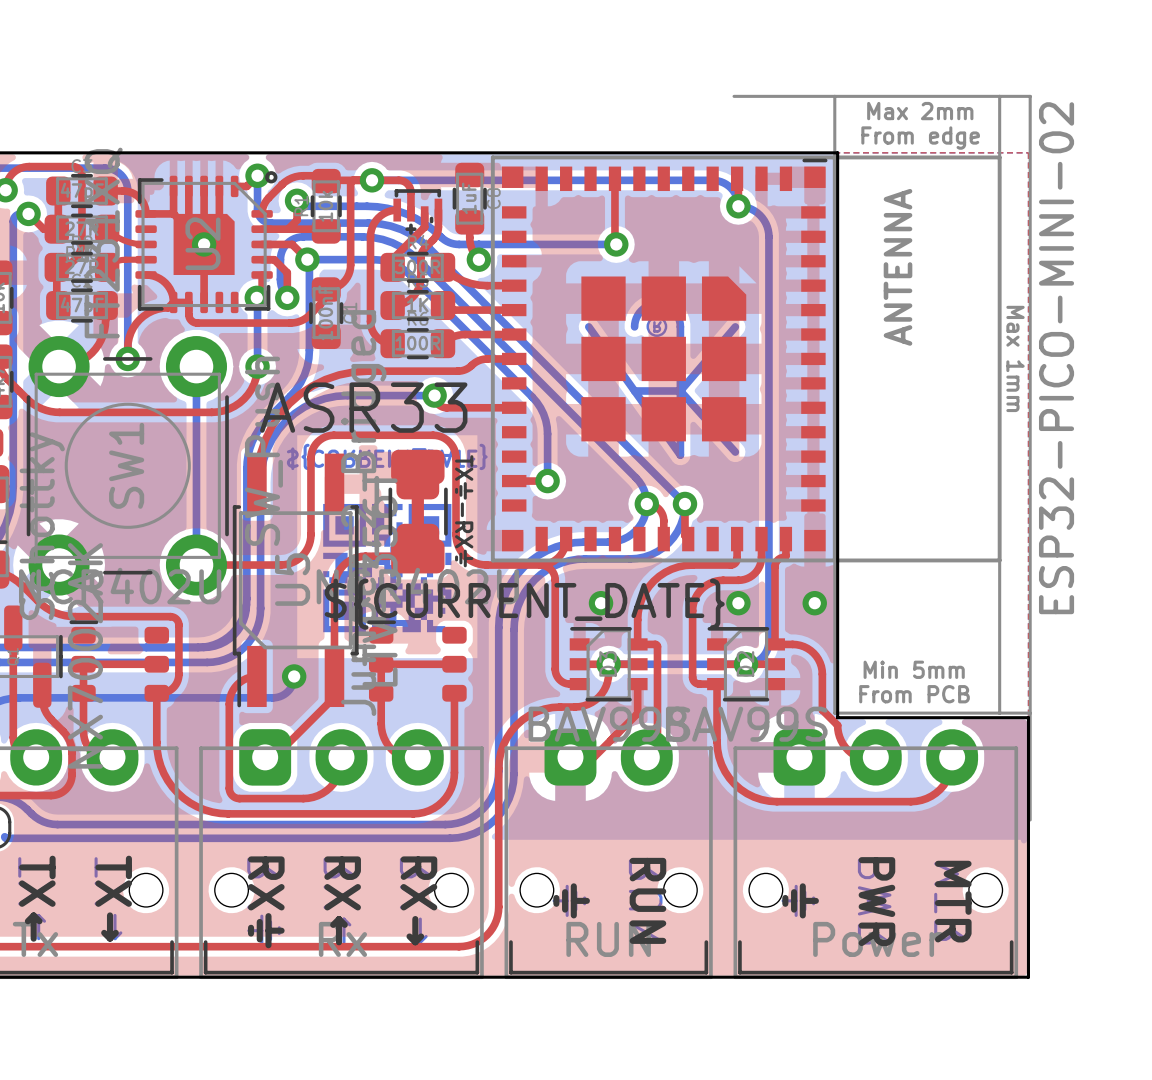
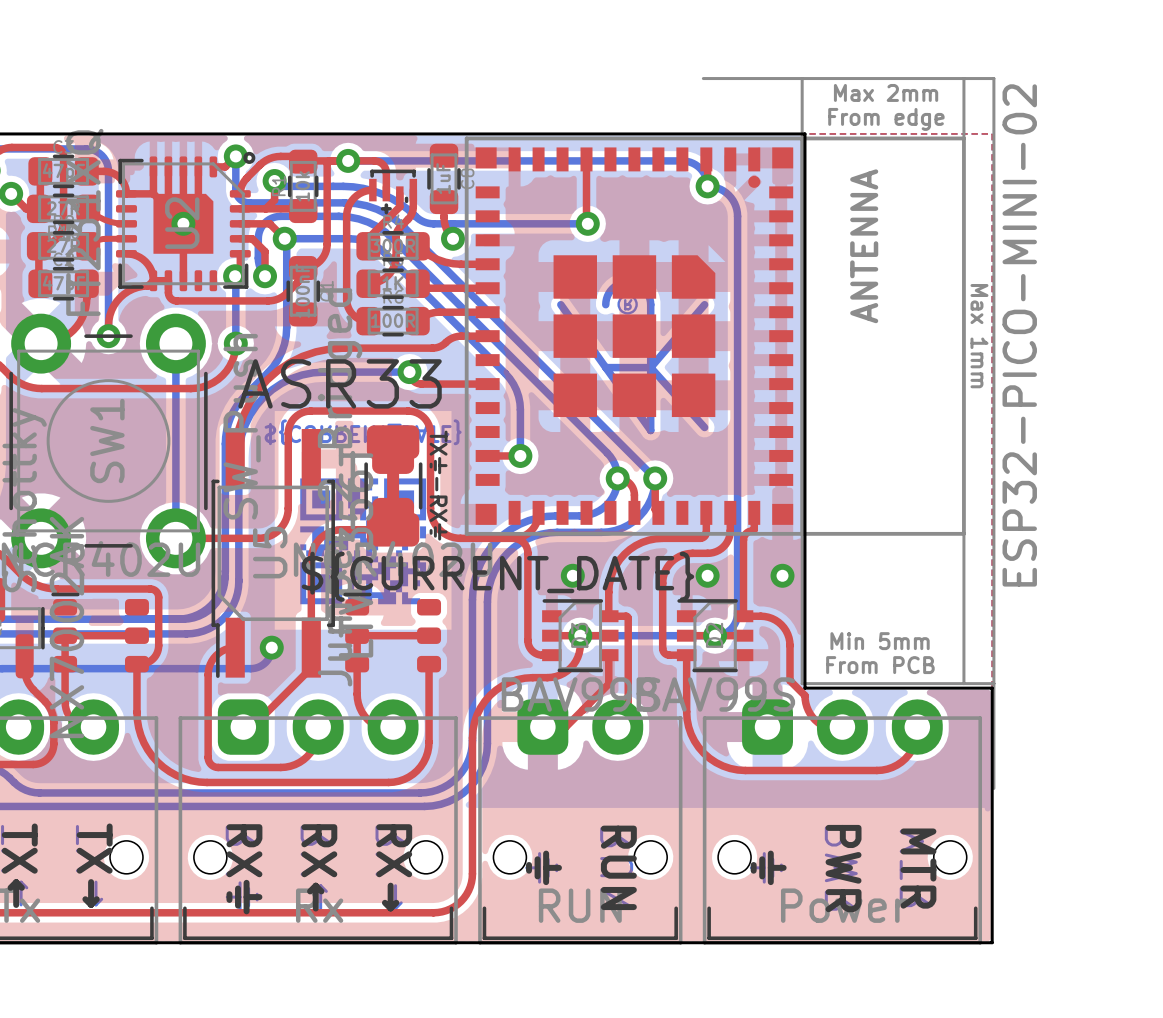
part footprint: [490, 94, 1032, 822] -> [464, 77, 996, 790]

